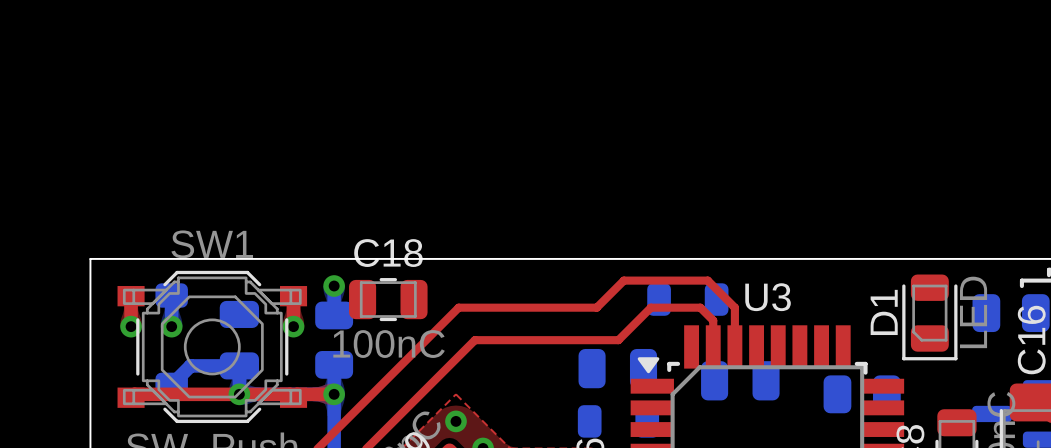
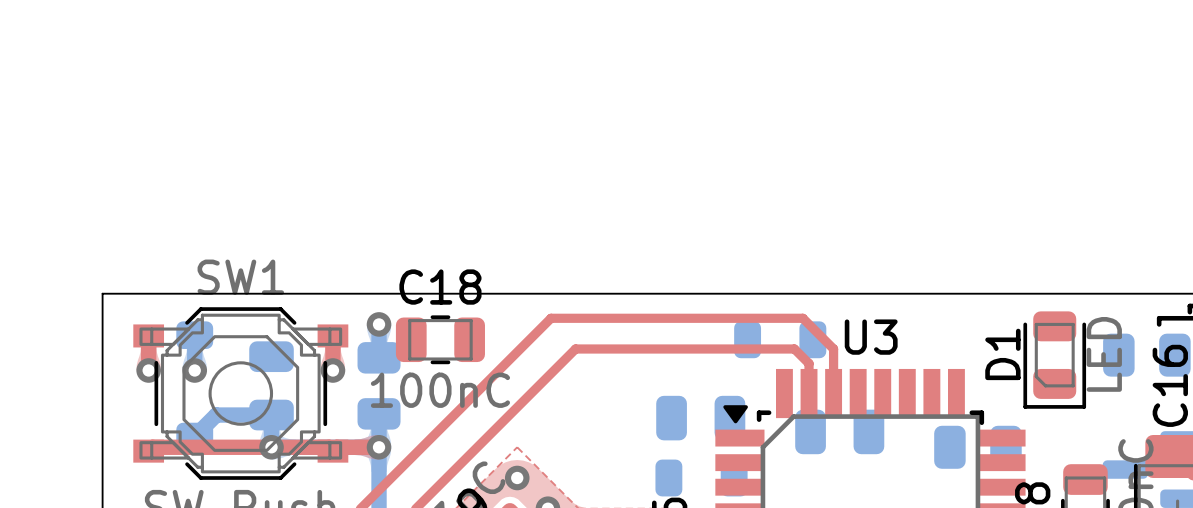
top track: (623, 280) (596, 307) -> (738, 349) (676, 349)
top track: none -> (707, 318) (551, 318) (520, 349)
top track: (458, 307) (507, 307) -> (538, 385) (575, 349)
top track: (650, 307) (618, 340) (474, 340) -> none

